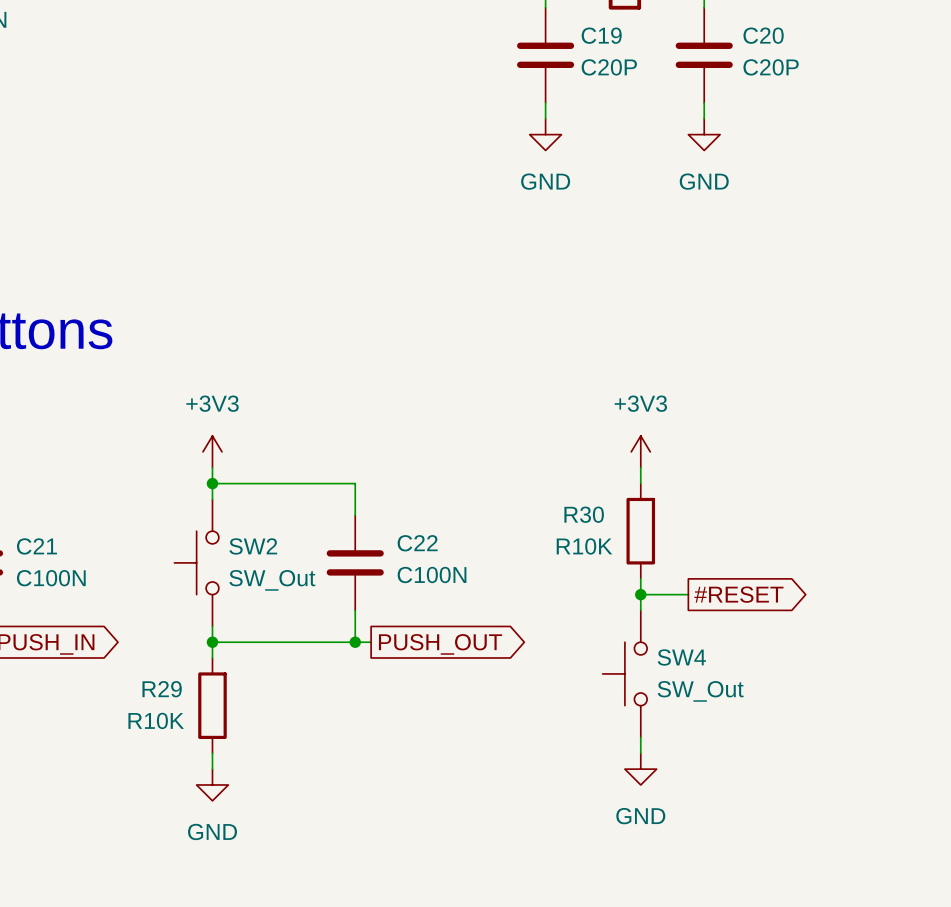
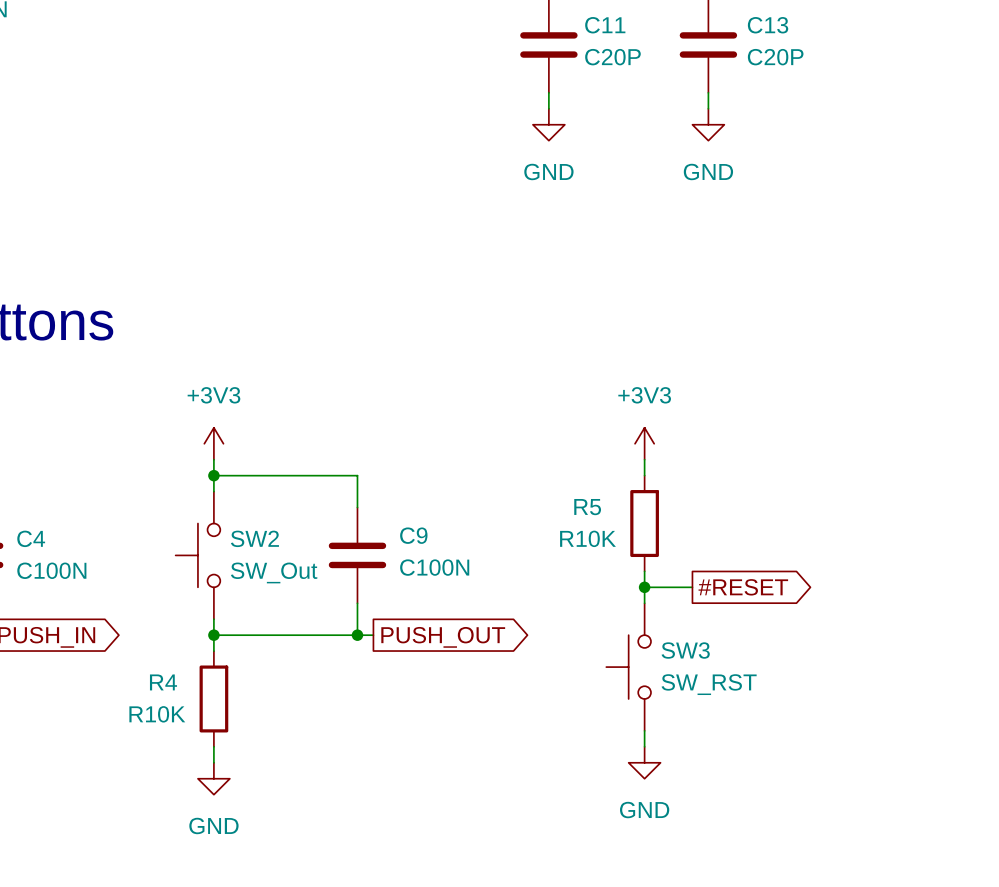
C19 name: C19 (601, 35) -> C11 (605, 25)
C20 name: C20 (763, 35) -> C13 (768, 25)
R30 name: R30 (584, 514) -> R5 (587, 507)
C22 name: C22 (417, 543) -> C9 (413, 535)
C21 name: C21 (36, 546) -> C4 (31, 538)
SW4 name: SW4 (681, 657) -> SW3 (685, 650)
R29 name: R29 (162, 689) -> R4 (163, 682)
SW4 value: SW_Out (700, 691) -> SW_RST (709, 684)

